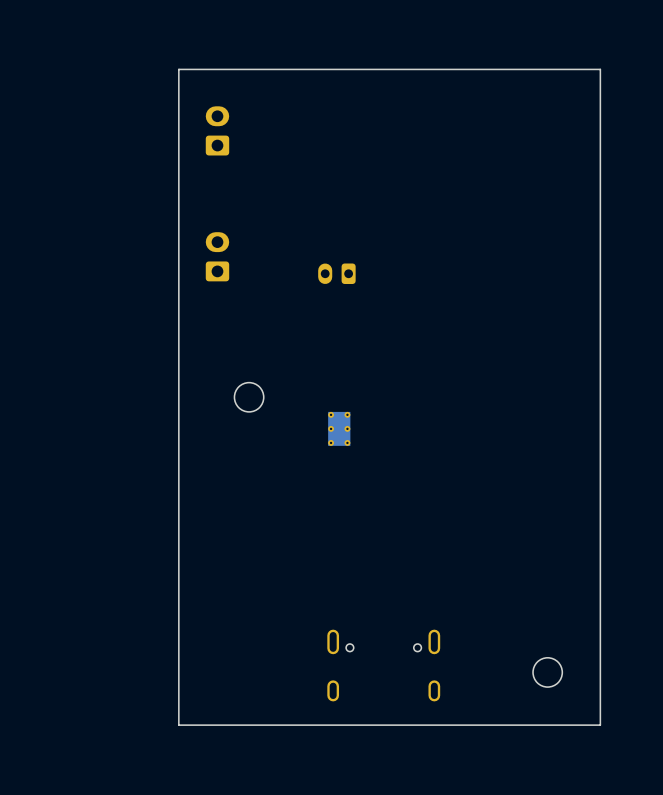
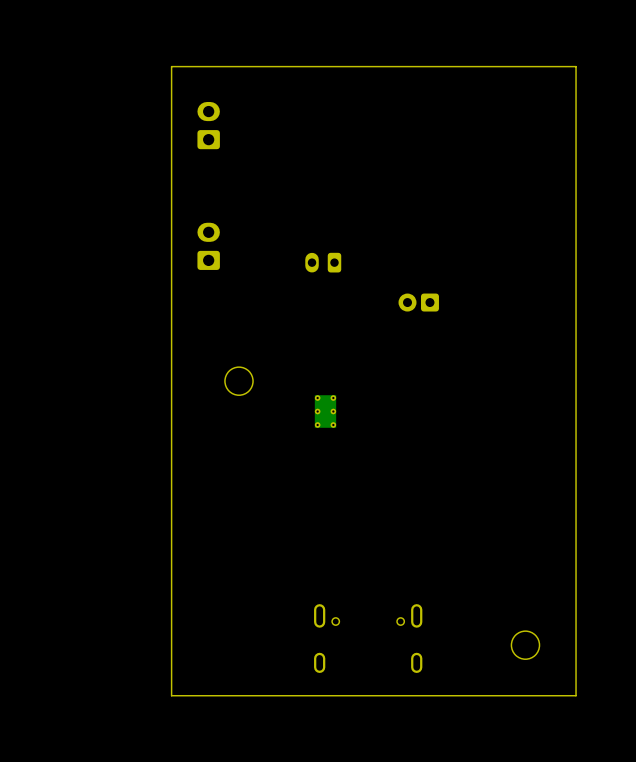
part: none -> (418, 302)

